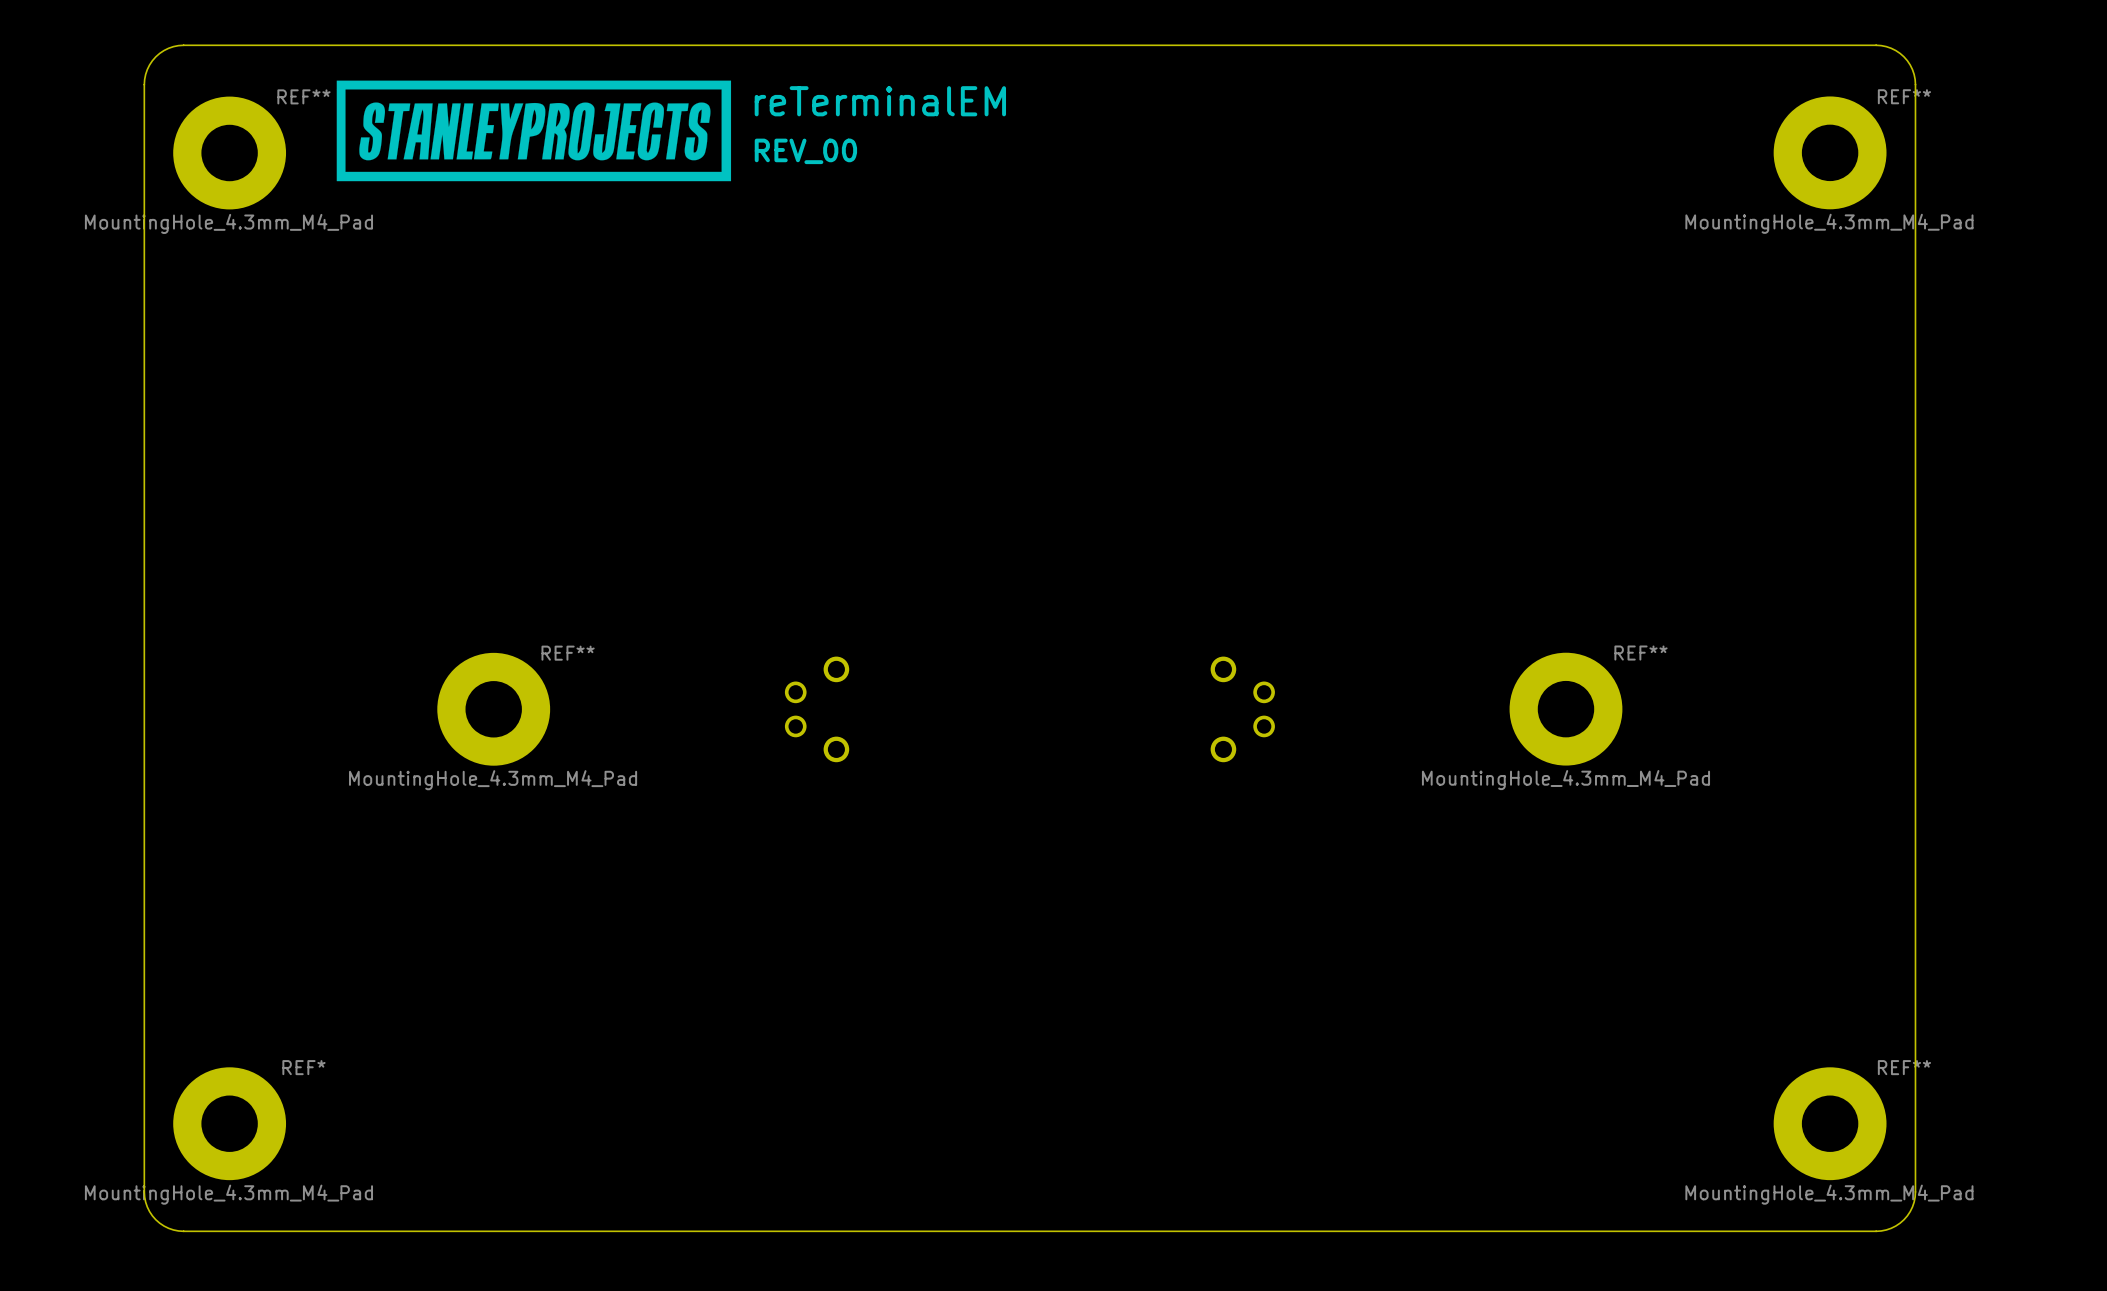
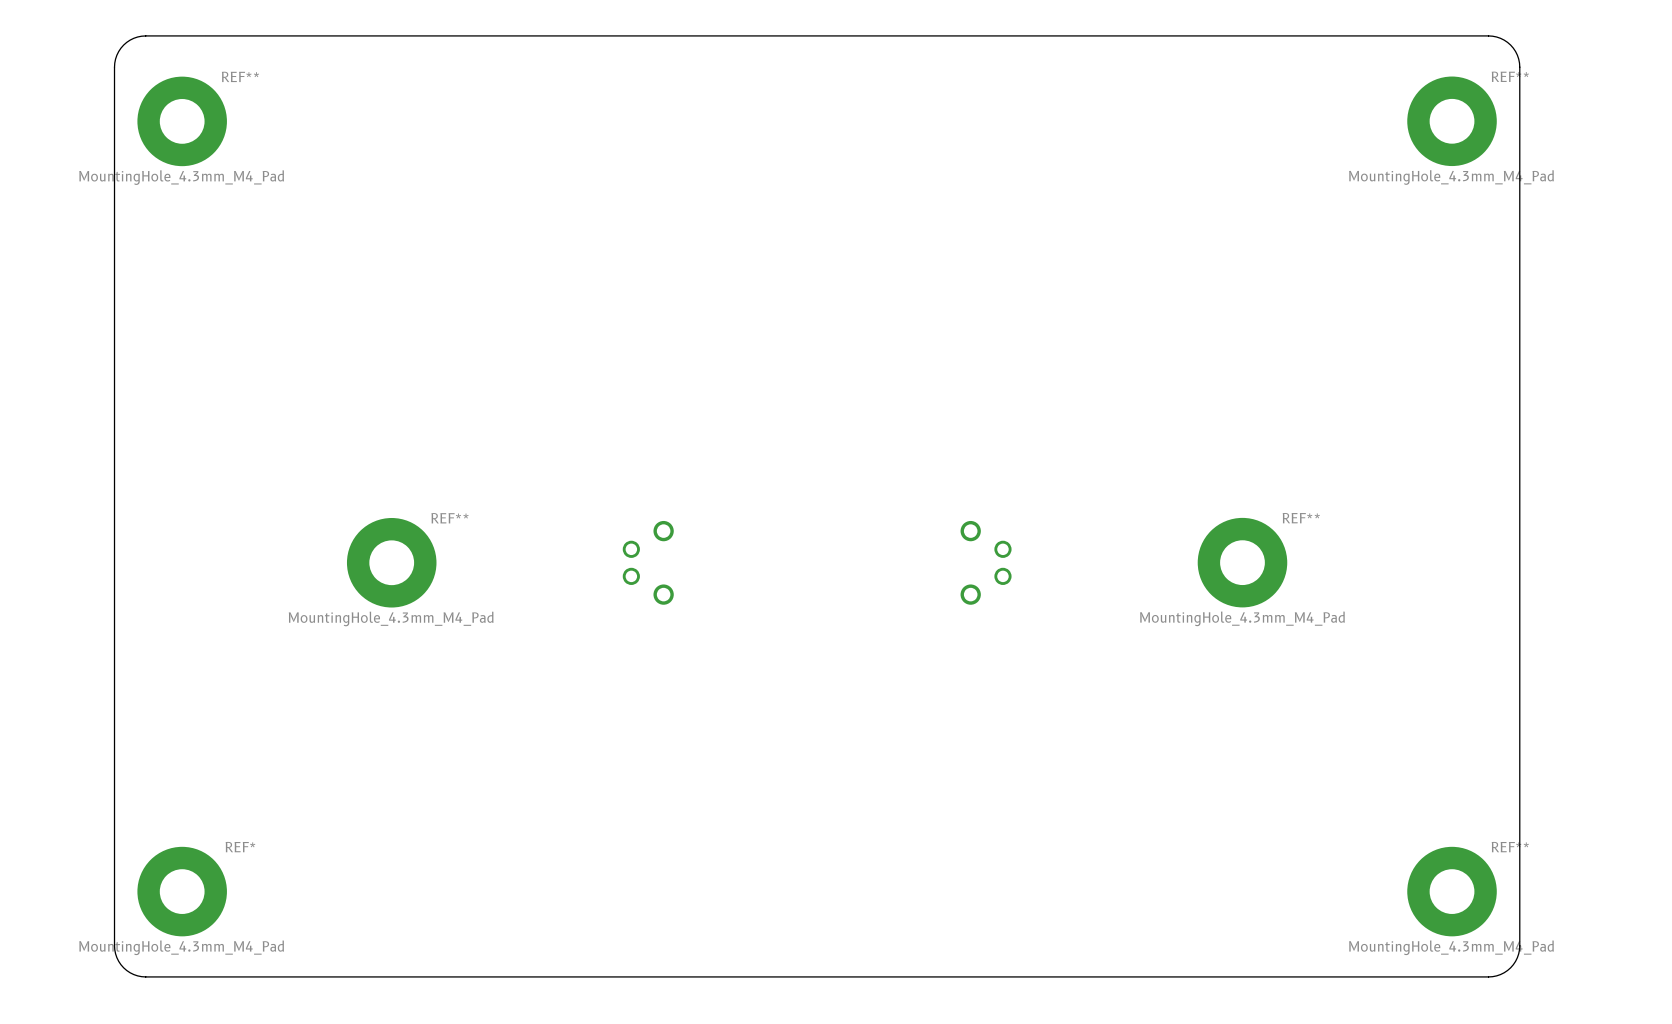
drawing: [336, 80, 732, 182] -> none
text: reTerminalEM (880, 101) -> none
text: REV_00 (805, 151) -> none

